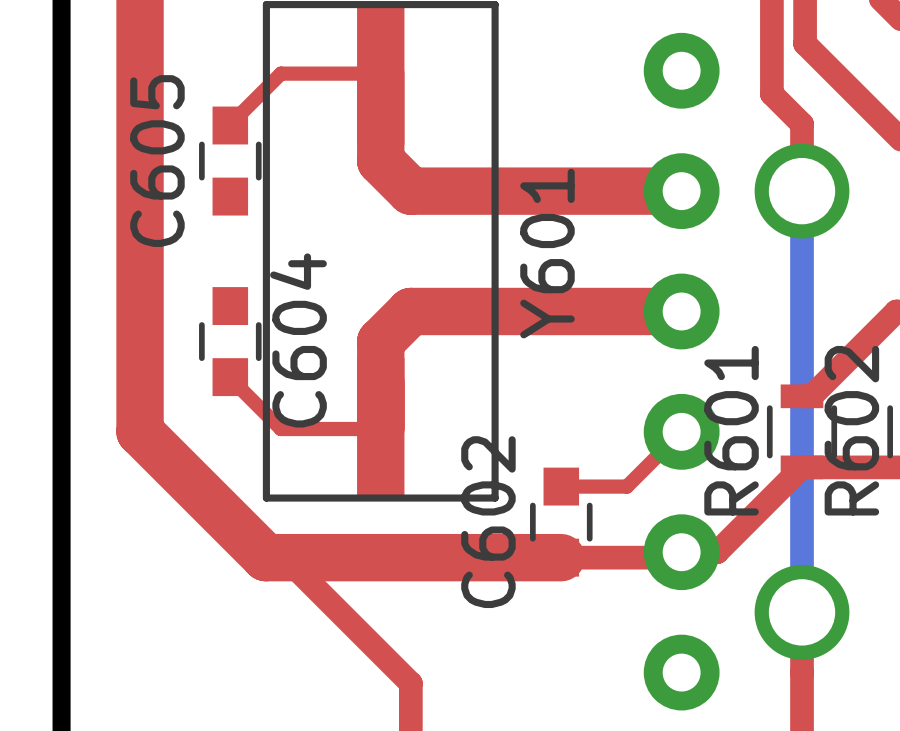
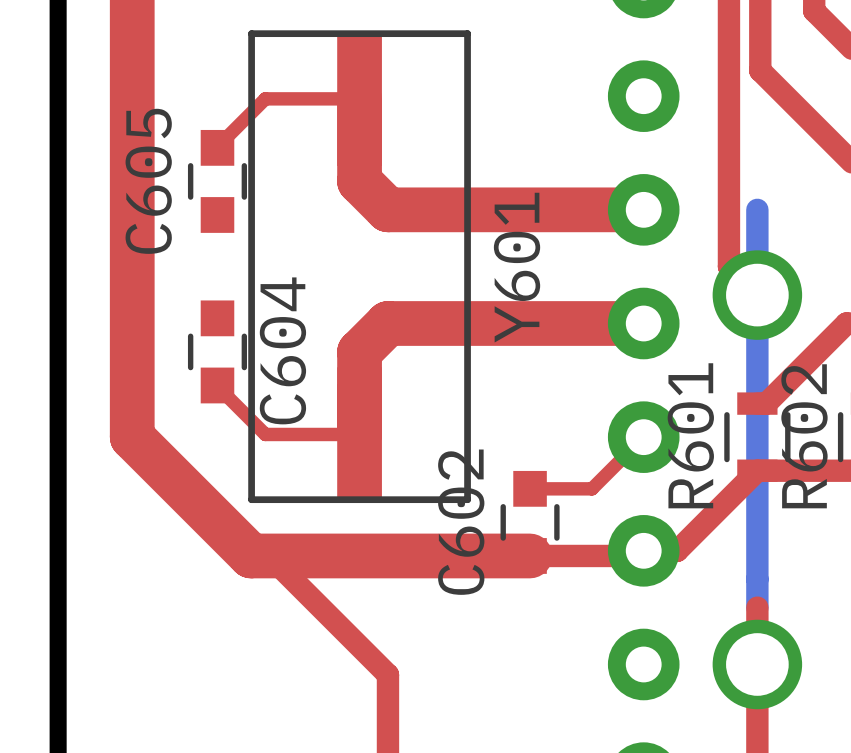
top track: (771, 94) (802, 124) (802, 191) -> (728, 118) (728, 266) (757, 295)
via position: (802, 191) -> (757, 295)
via position: (802, 612) -> (757, 664)

